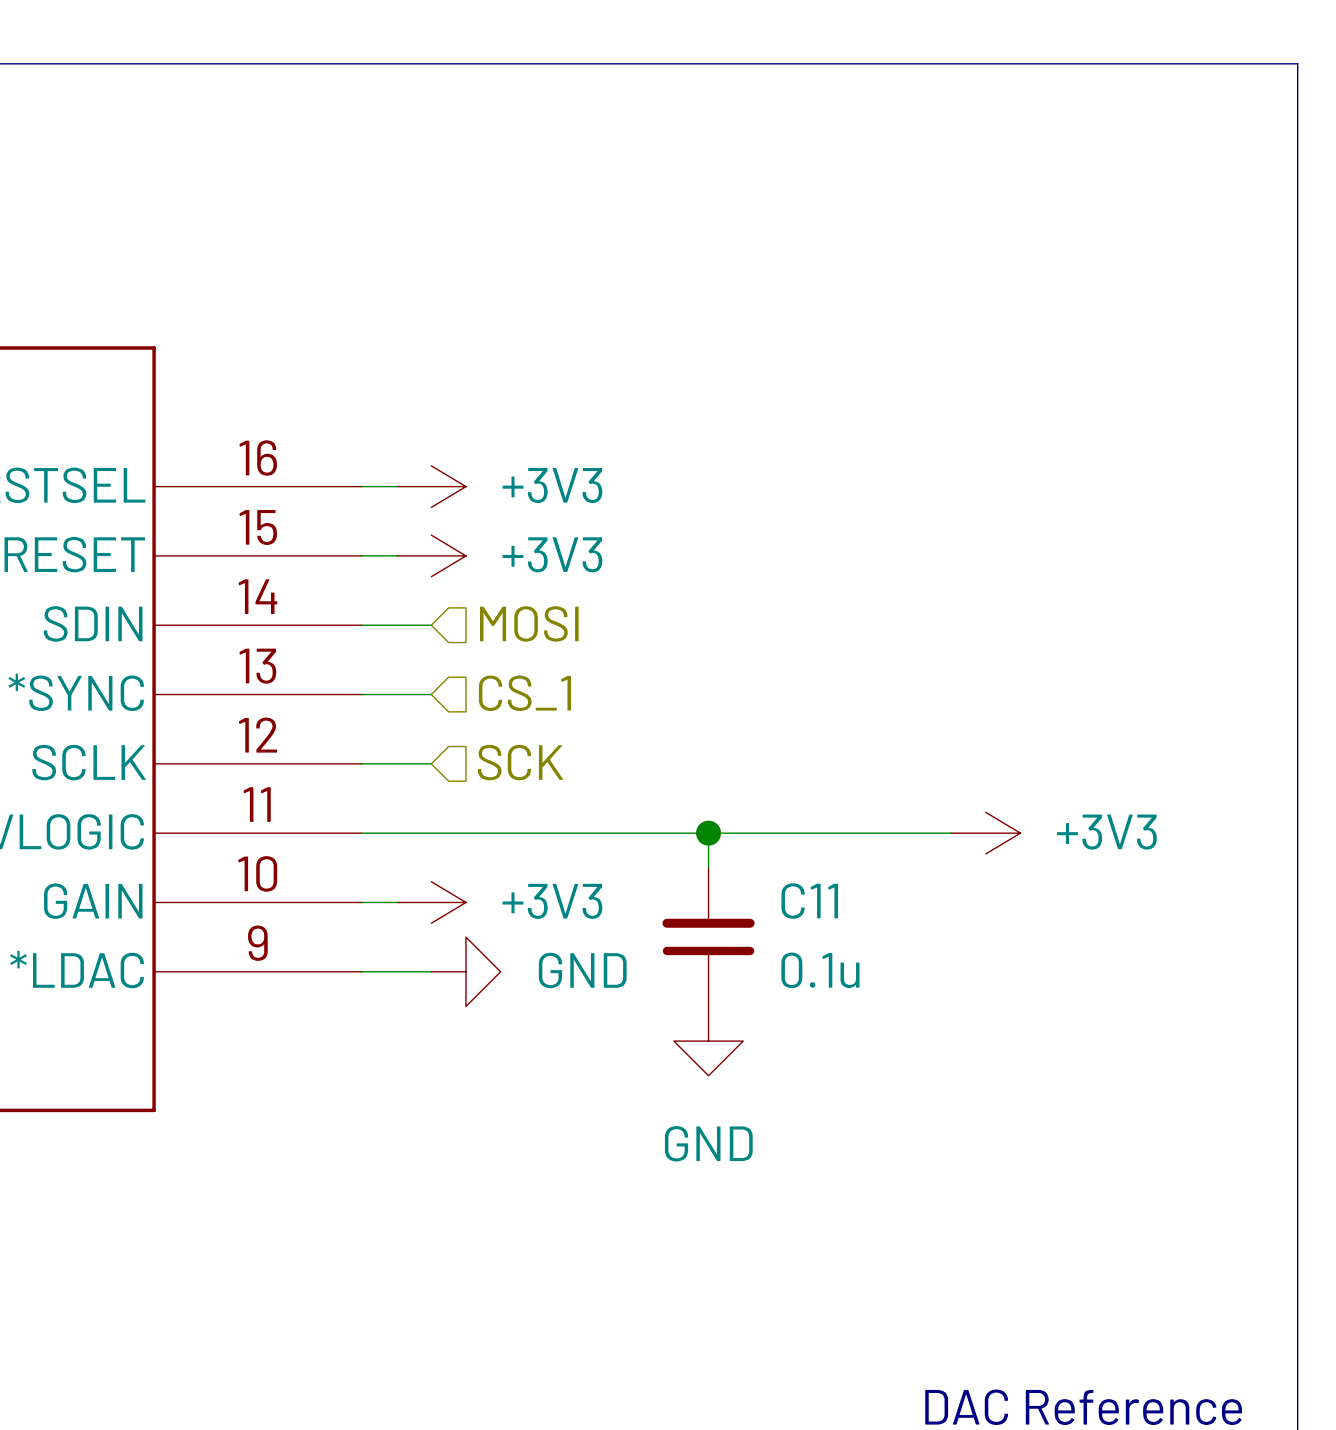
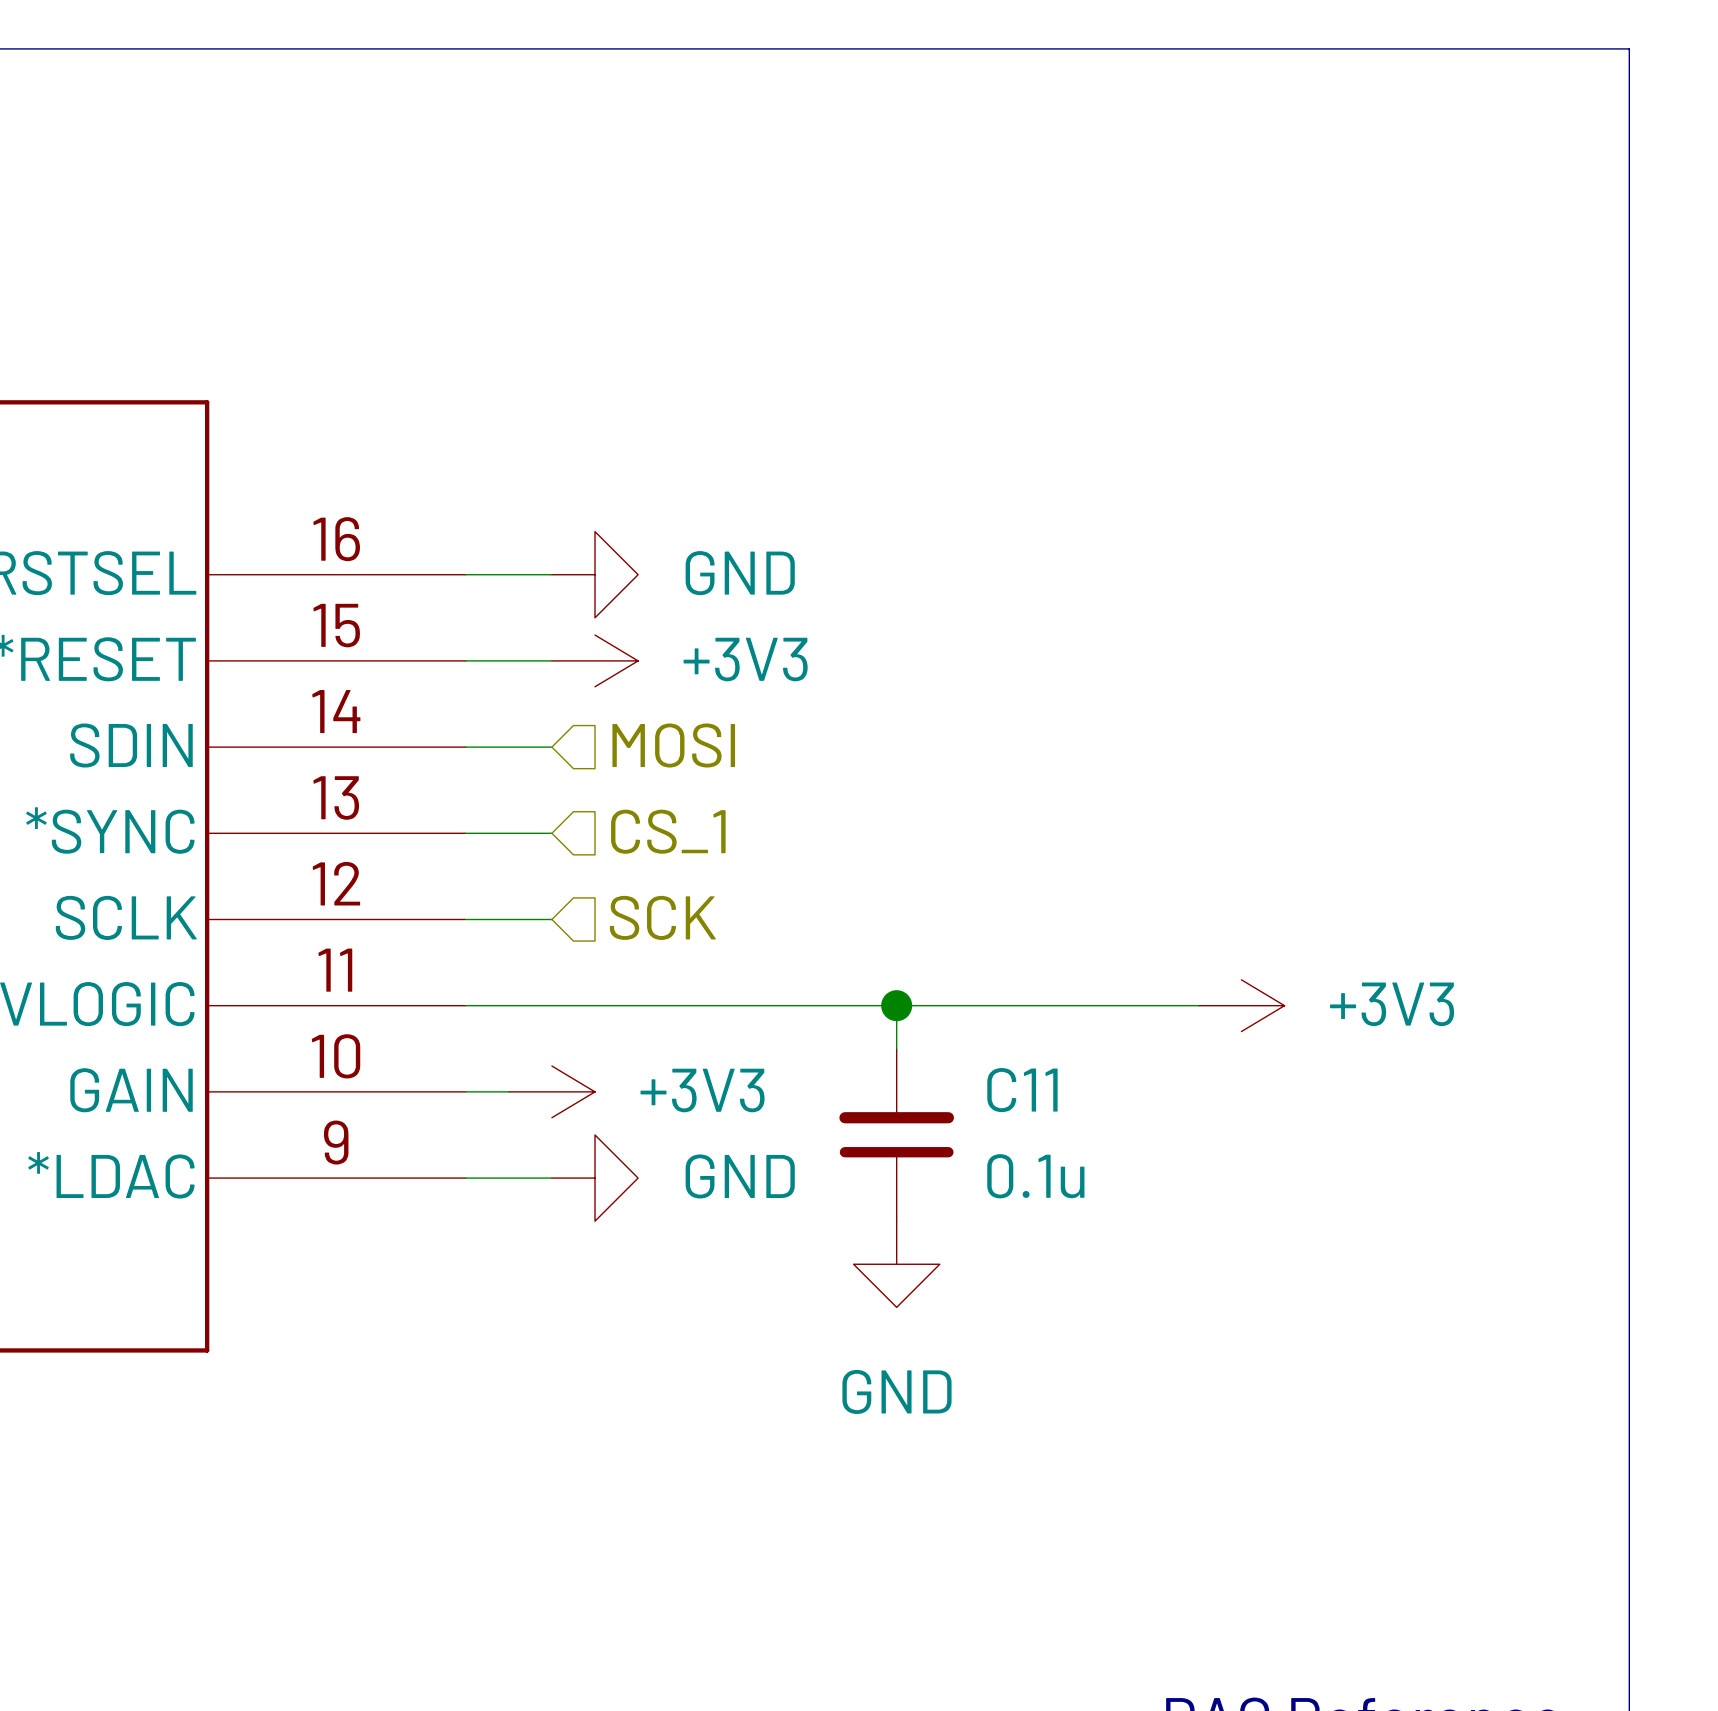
power symbol: +3V3 (431, 486) -> none
power symbol: none -> GND (595, 574)
power symbol position: +3V3 (431, 555) -> +3V3 (595, 660)

